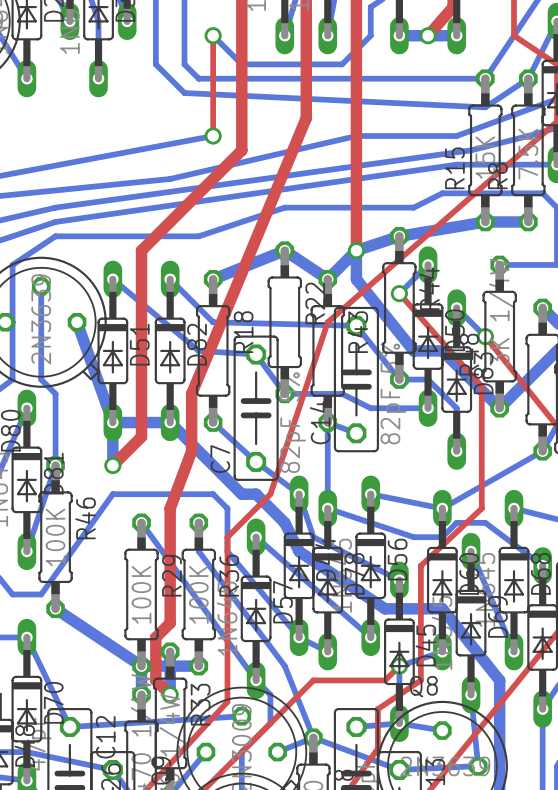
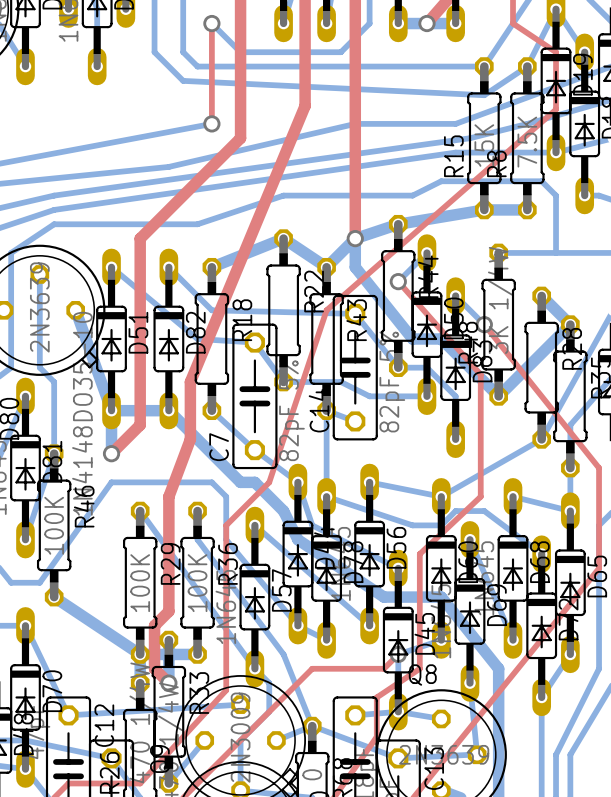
D51 value: none -> 1N4148DO35-10 (82, 413)

